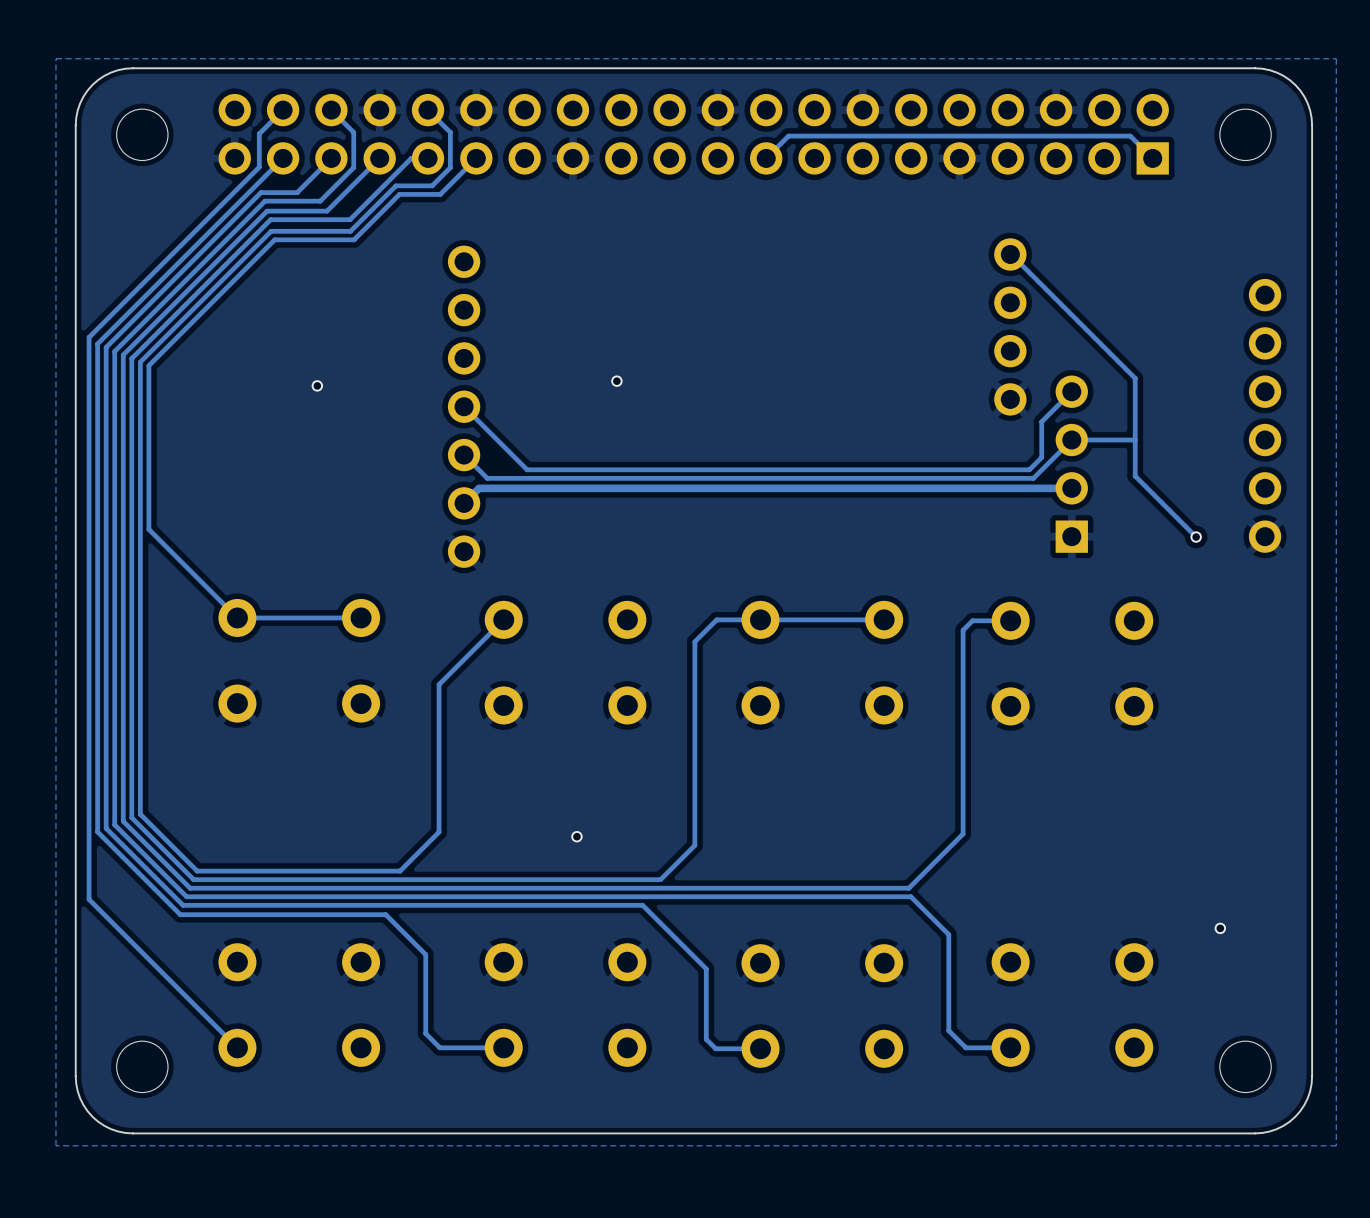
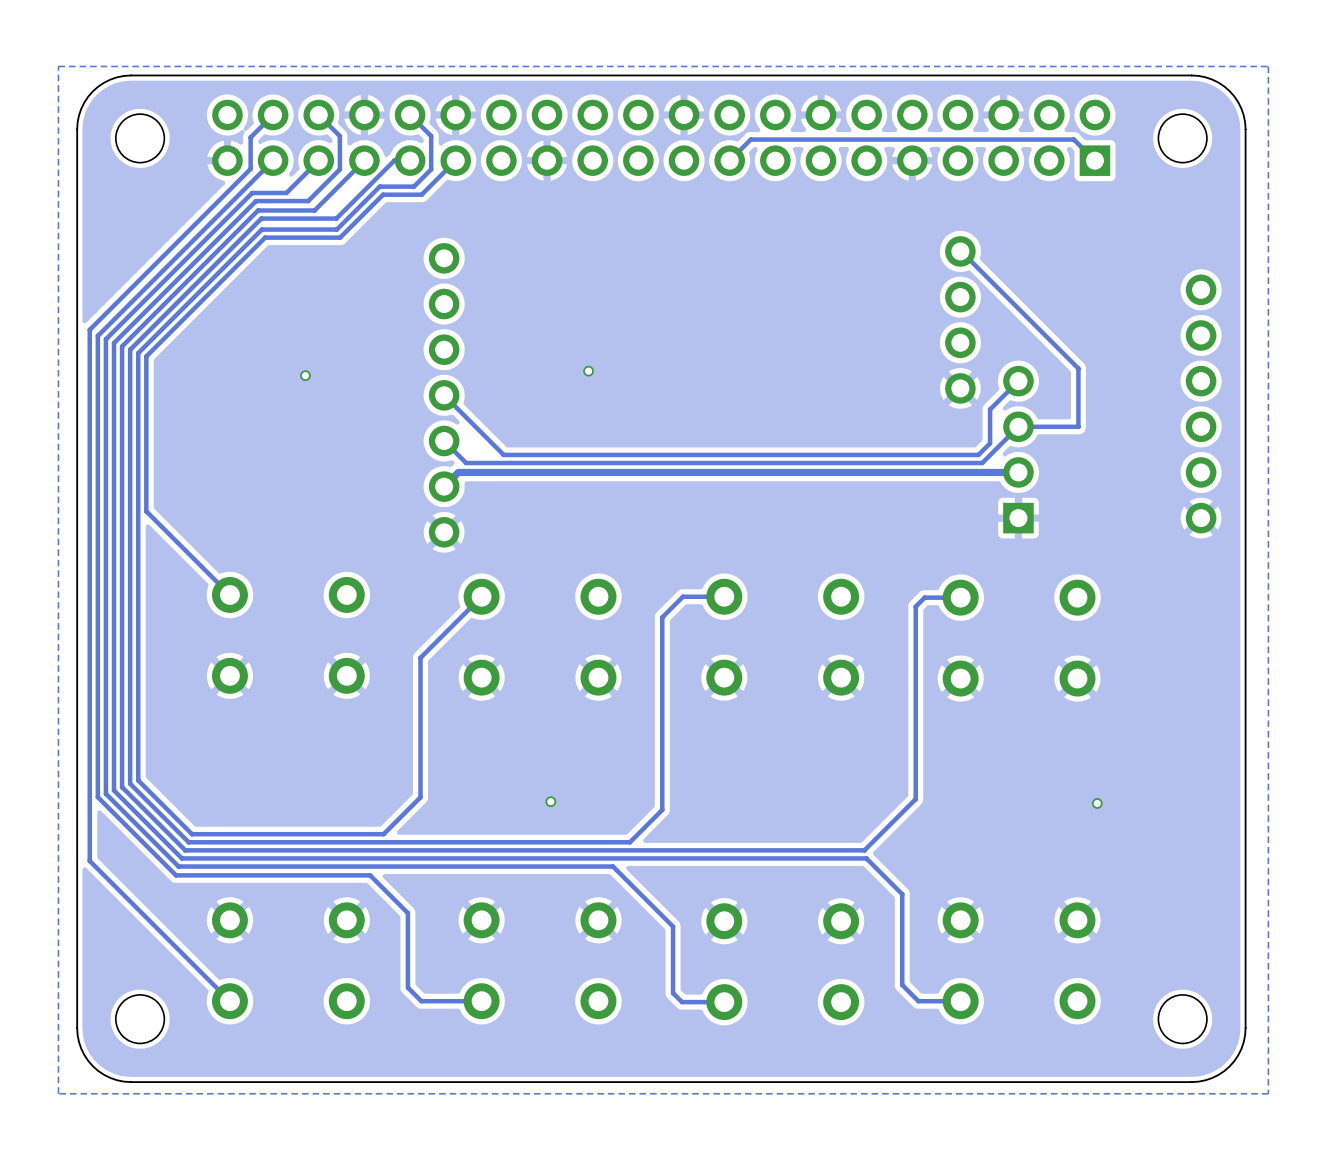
track: (1135, 440) (1135, 475) -> none
track: (1135, 476) (1196, 537) -> none
via: (1196, 537) -> none
track: (361, 617) (237, 617) -> none
track: (884, 619) (760, 619) -> none
via position: (1220, 928) -> (1097, 803)

